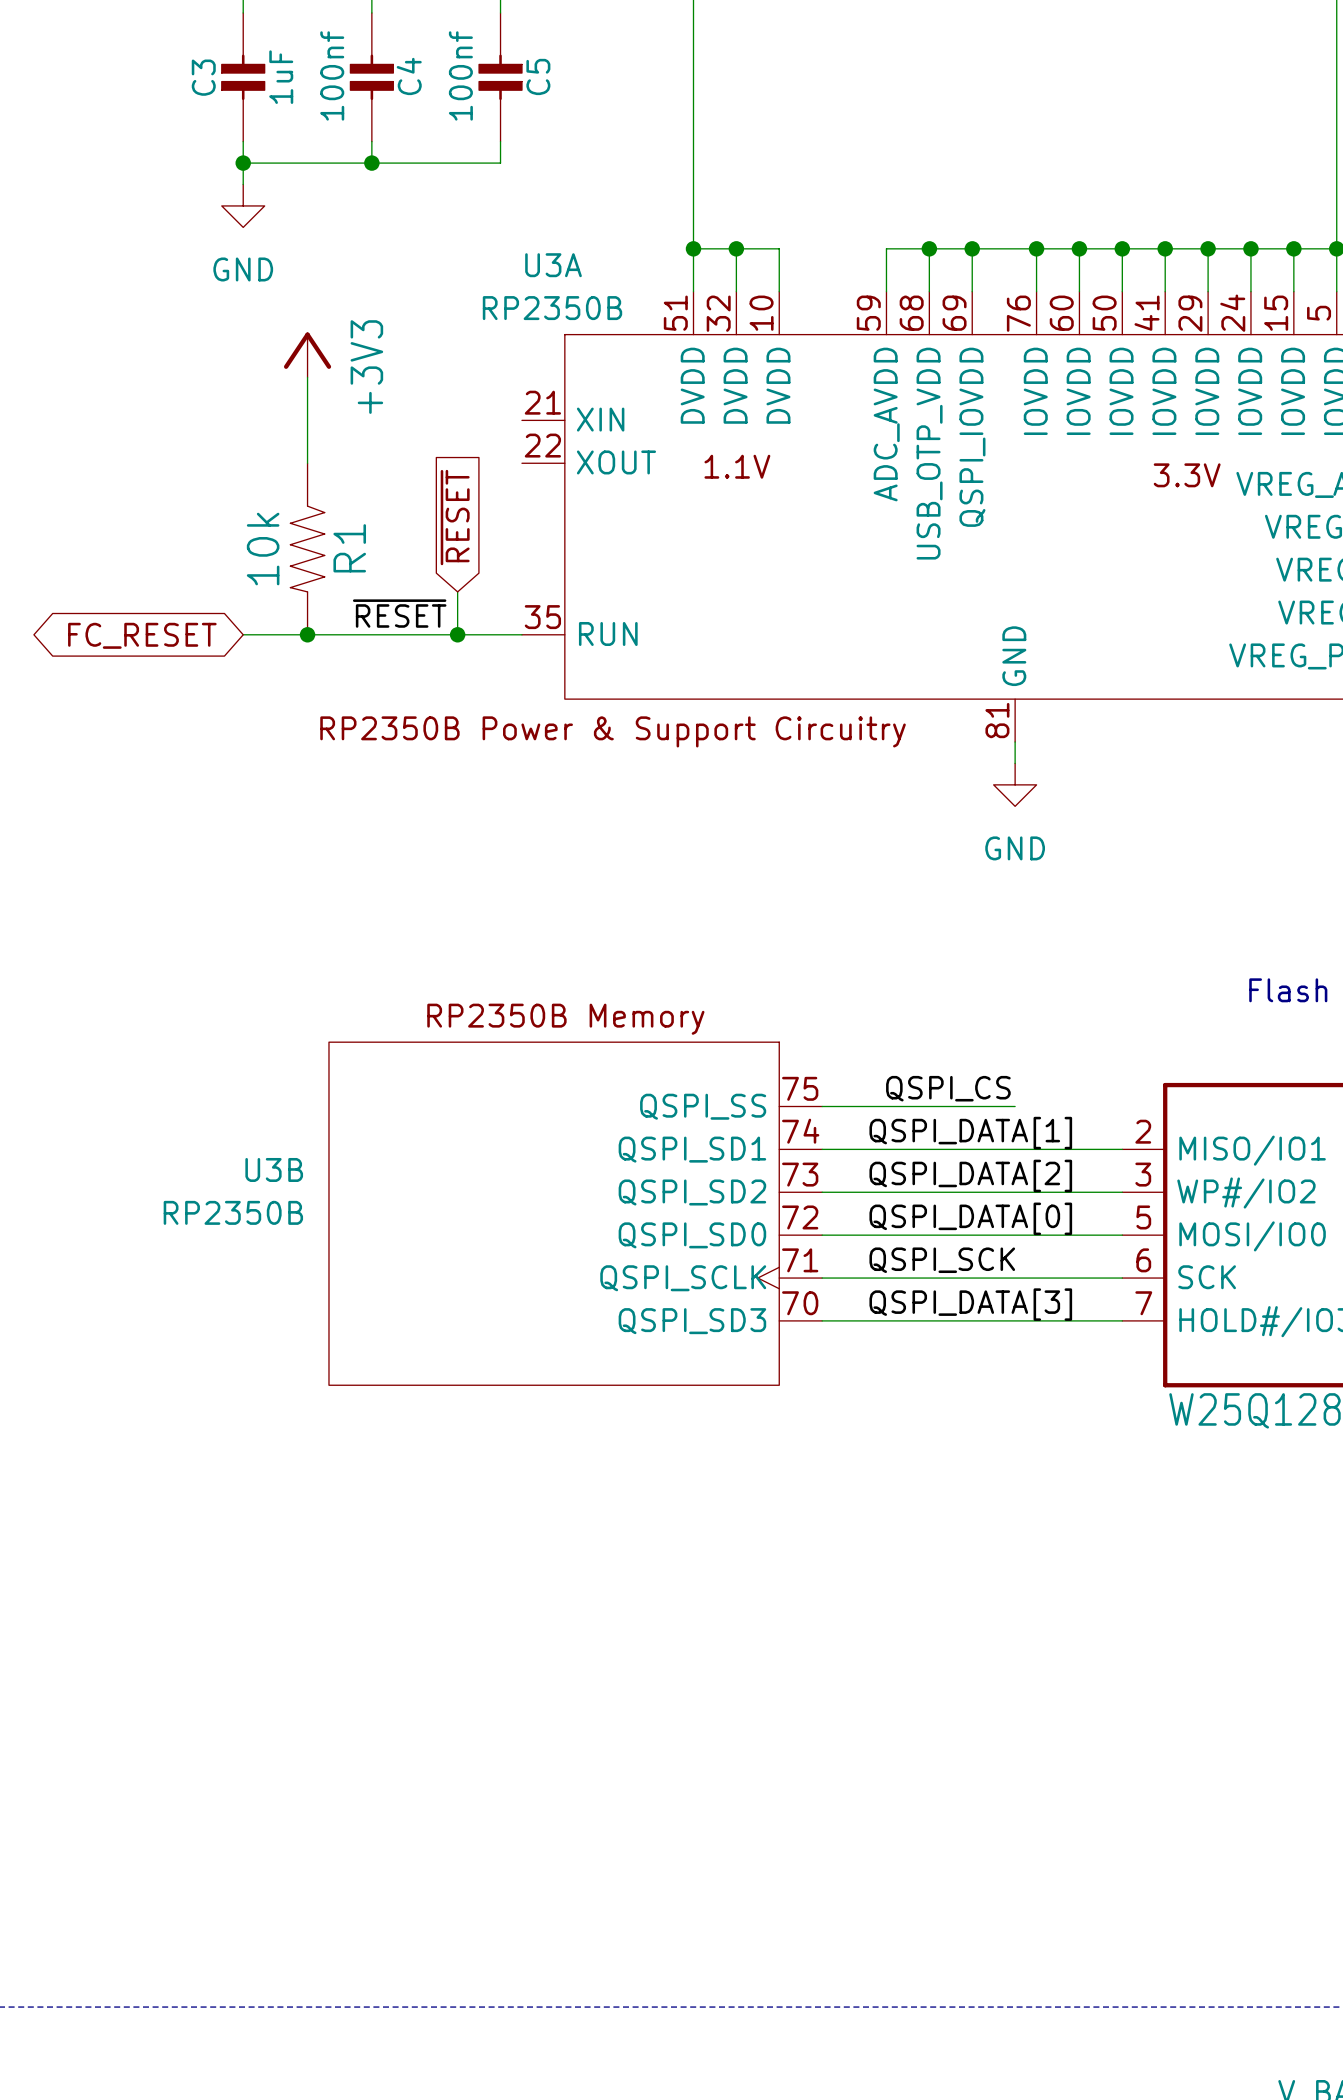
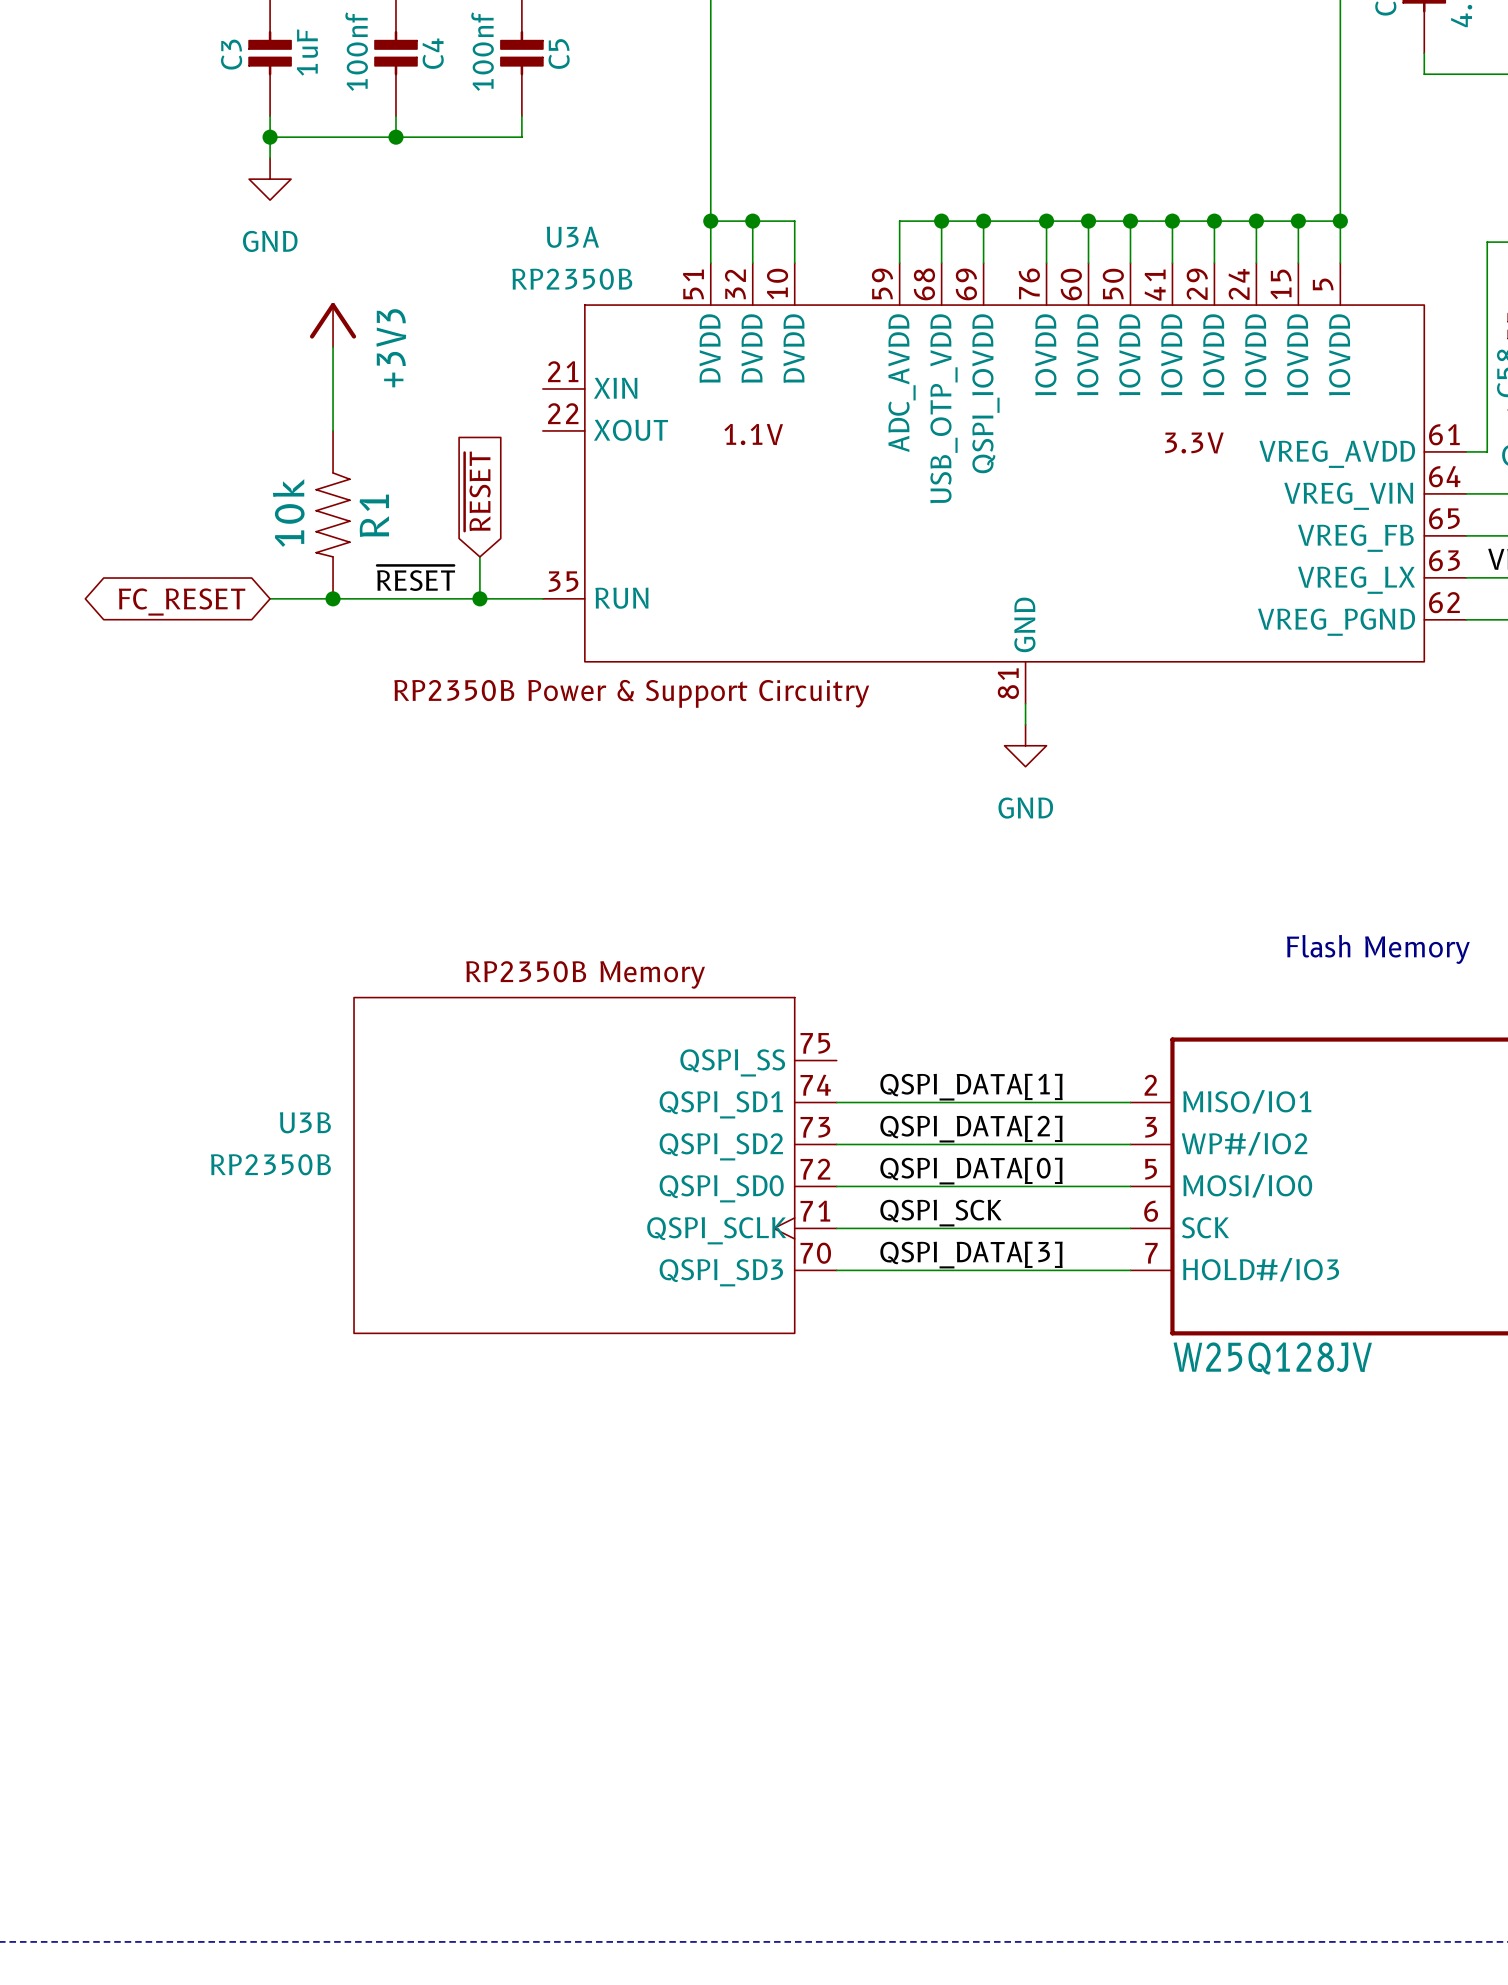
label: QSPI_CS (948, 1088) -> none
wire: (822, 1106) (1015, 1106) -> none

